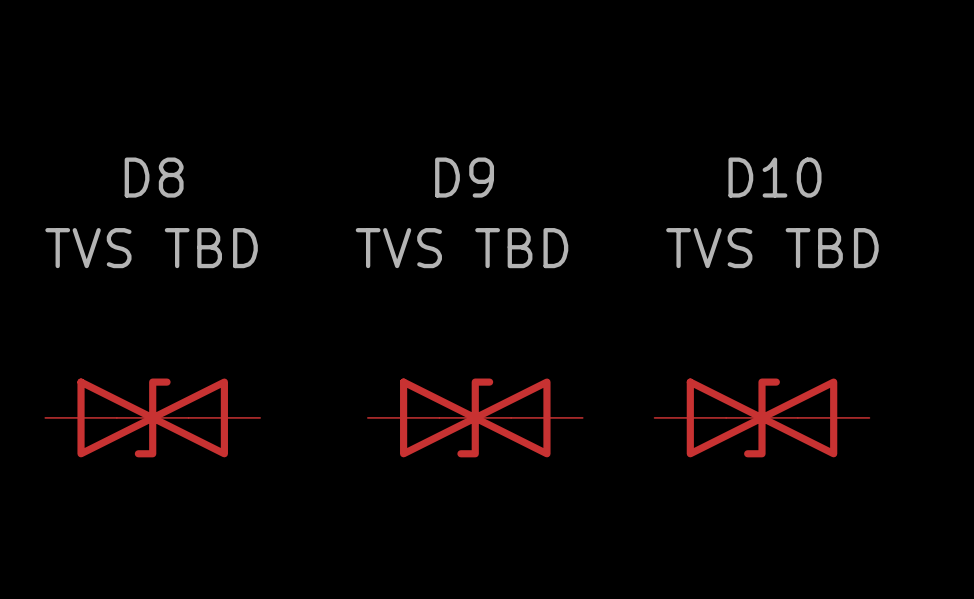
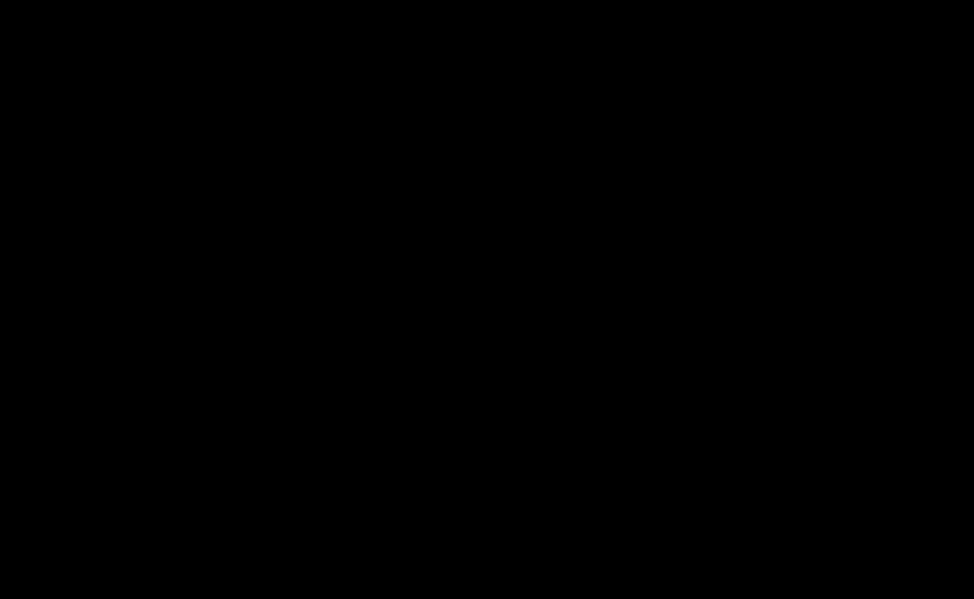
D8: TVS TBD (152, 417) -> none
D9: TVS TBD (475, 417) -> none
D10: TVS TBD (762, 417) -> none

